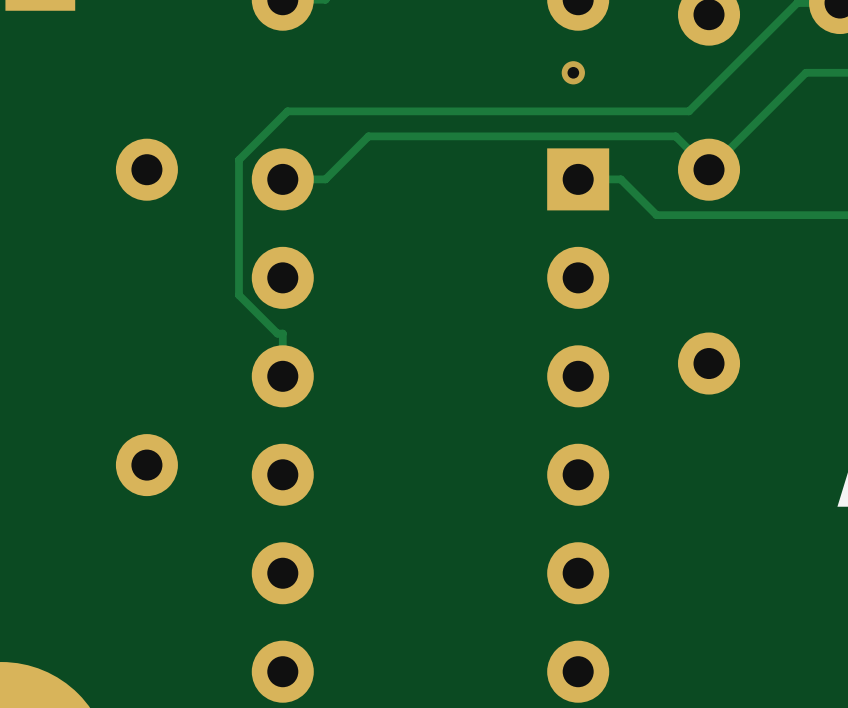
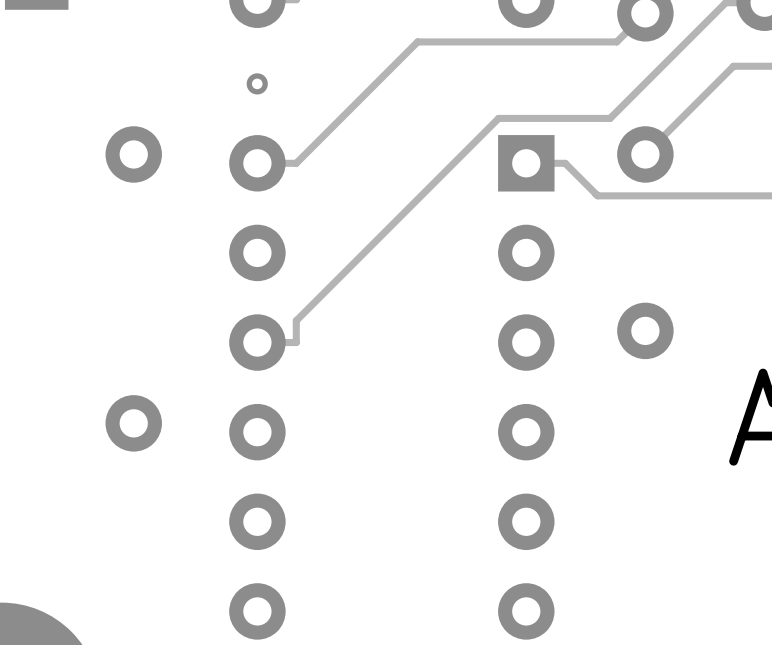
via: (573, 72) -> none
via: none -> (257, 83)
track: (688, 111) (287, 111) (238, 159) (238, 295) (277, 333) (282, 333) (282, 376) -> (627, 101) (610, 118) (498, 118) (296, 320) (296, 342) (257, 342)
track: (368, 136) (675, 136) (709, 169) -> (335, 124) (417, 41) (616, 41) (645, 13)

